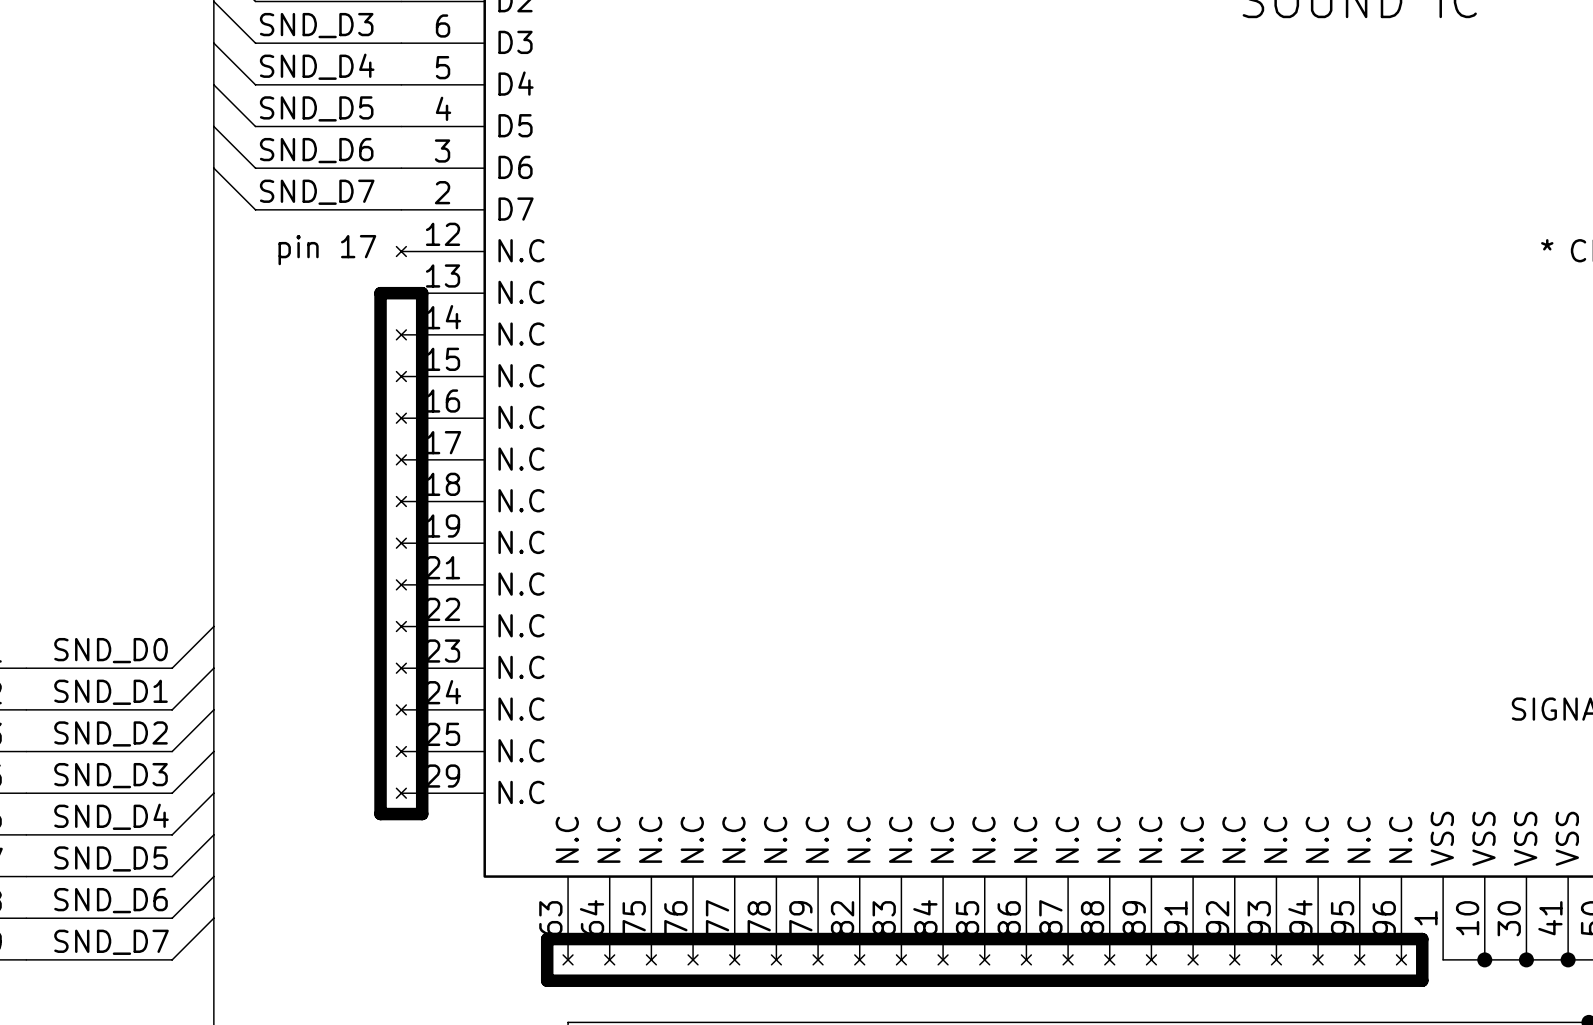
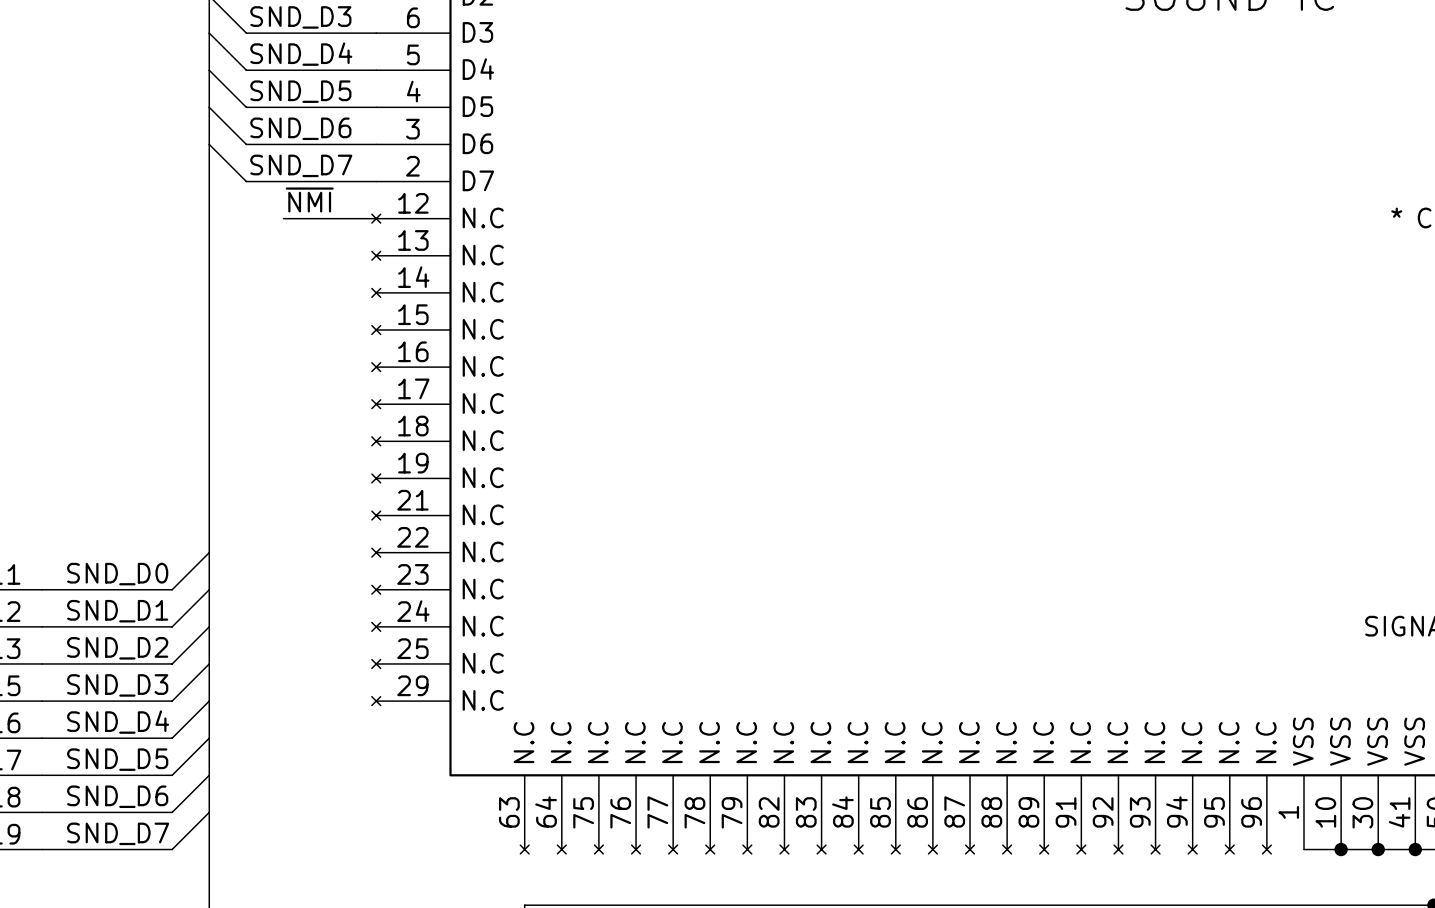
label: none -> ~{NMI} (309, 199)
text: pin 17 (327, 250) -> none
wire: none -> (283, 218) (376, 218)
line: (380, 293) (422, 293) (422, 814) (380, 814) (380, 293) -> none
line: (547, 939) (1422, 939) (1422, 980) (547, 980) (547, 939) -> none

